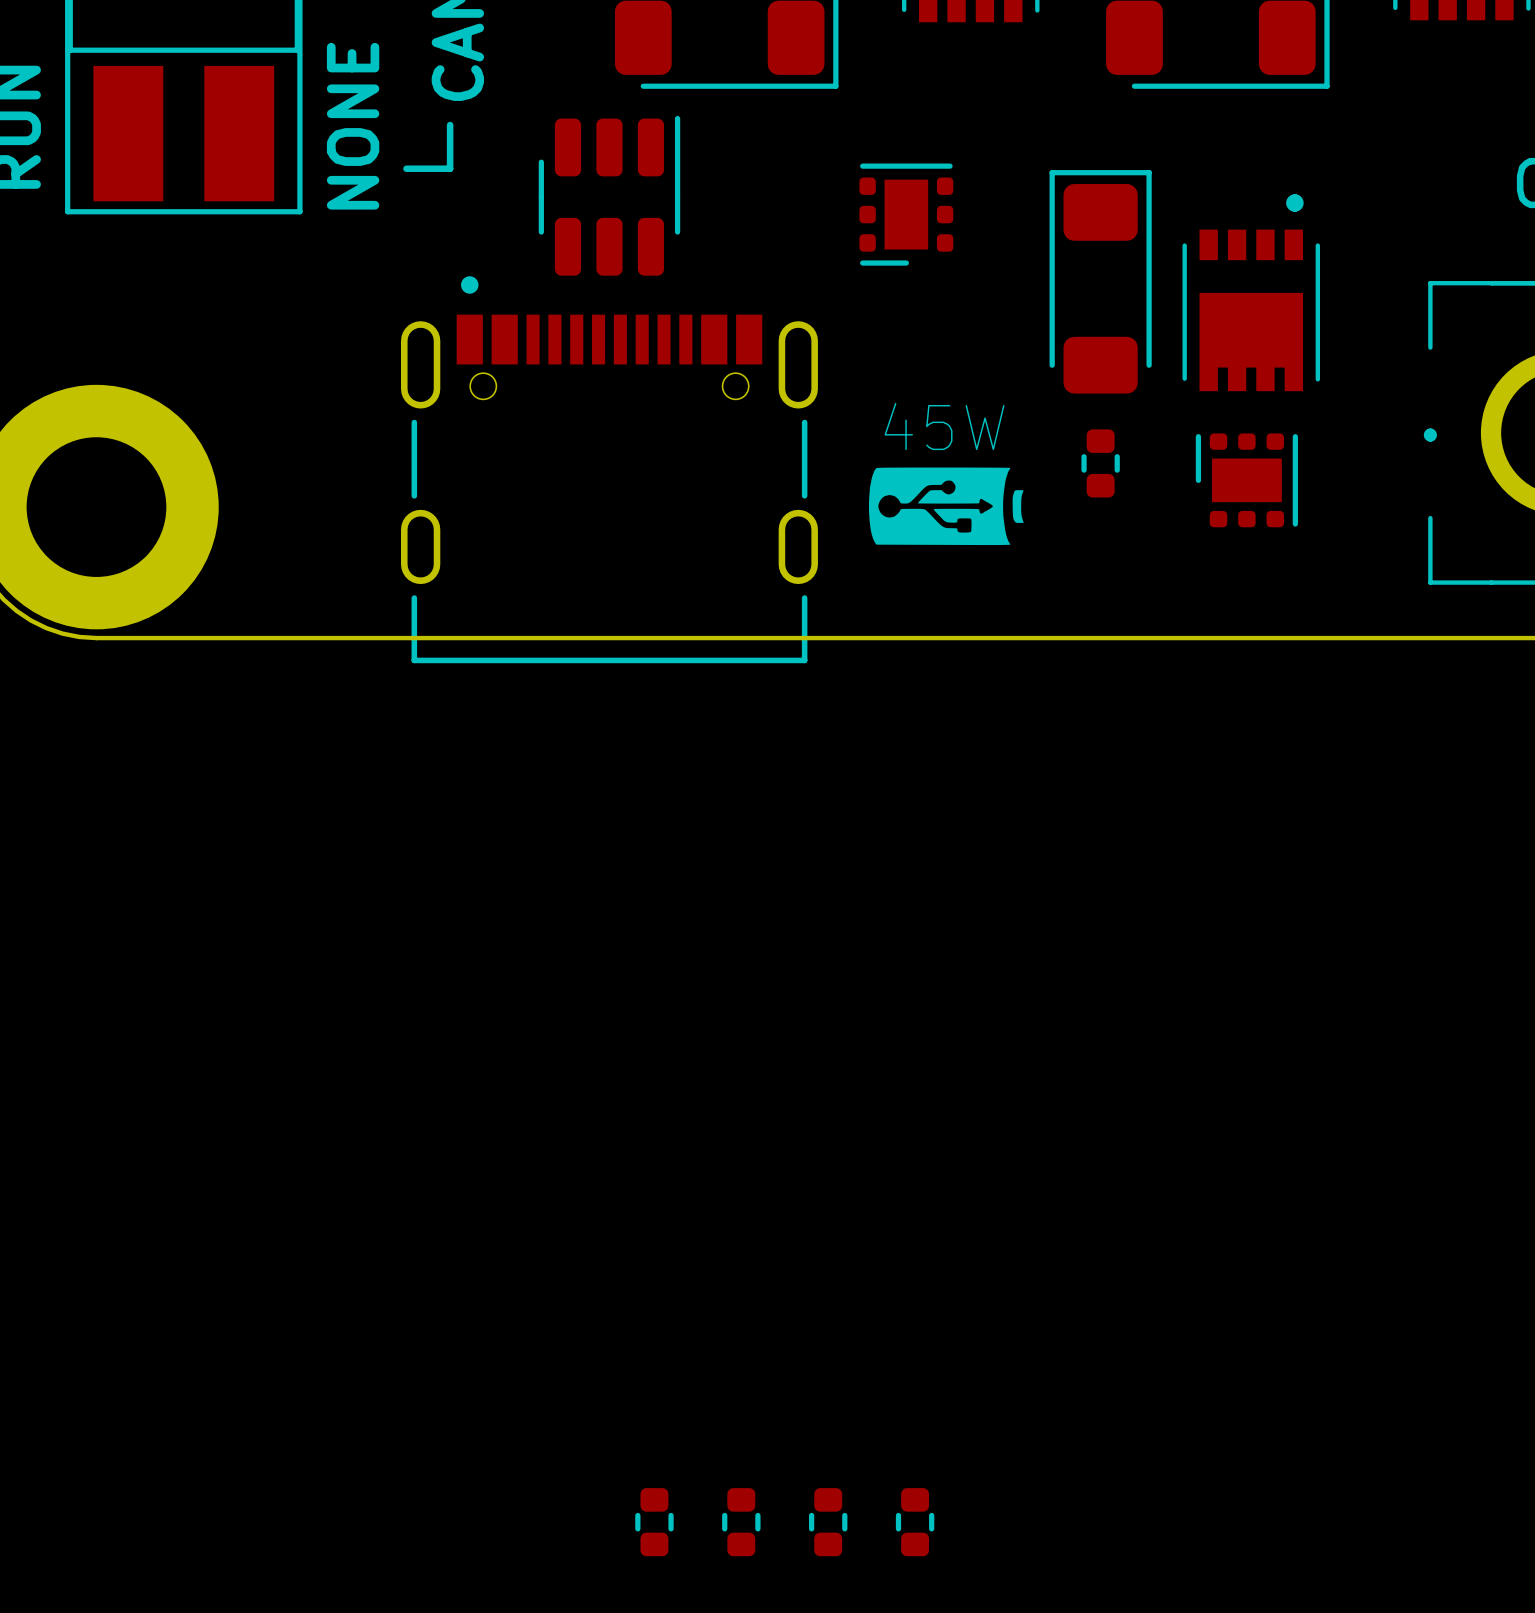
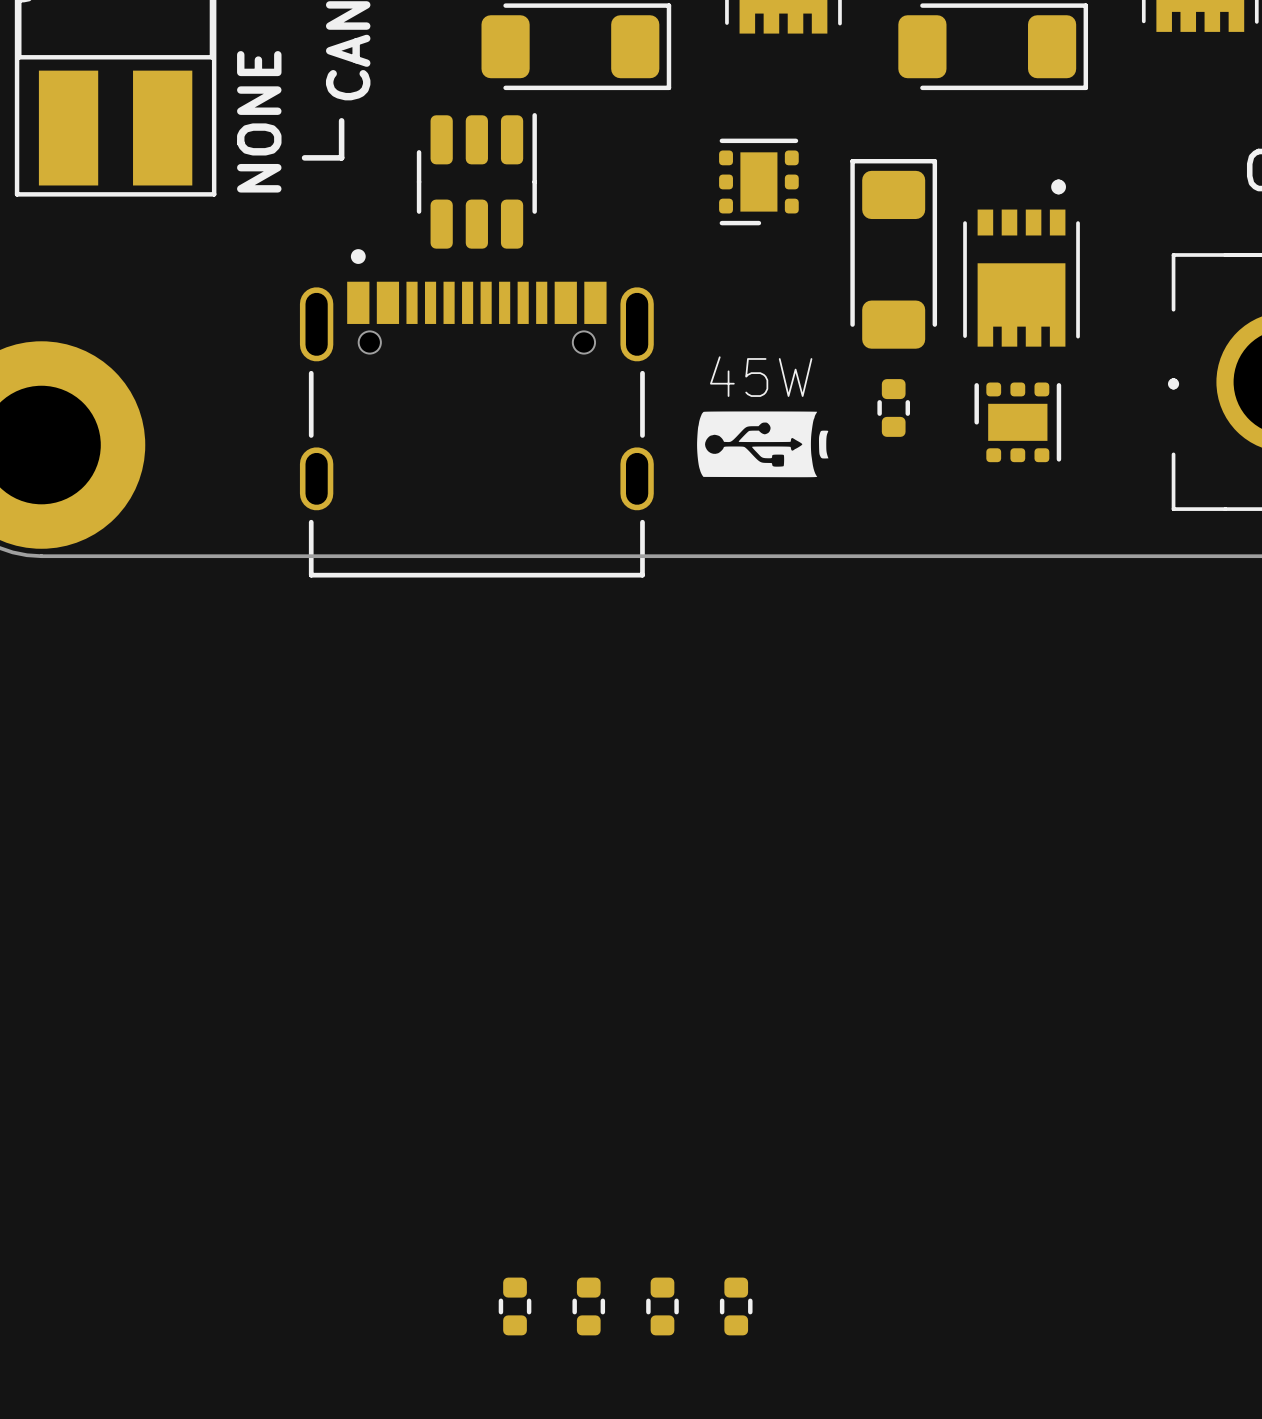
part position: (906, 214) -> (758, 181)

